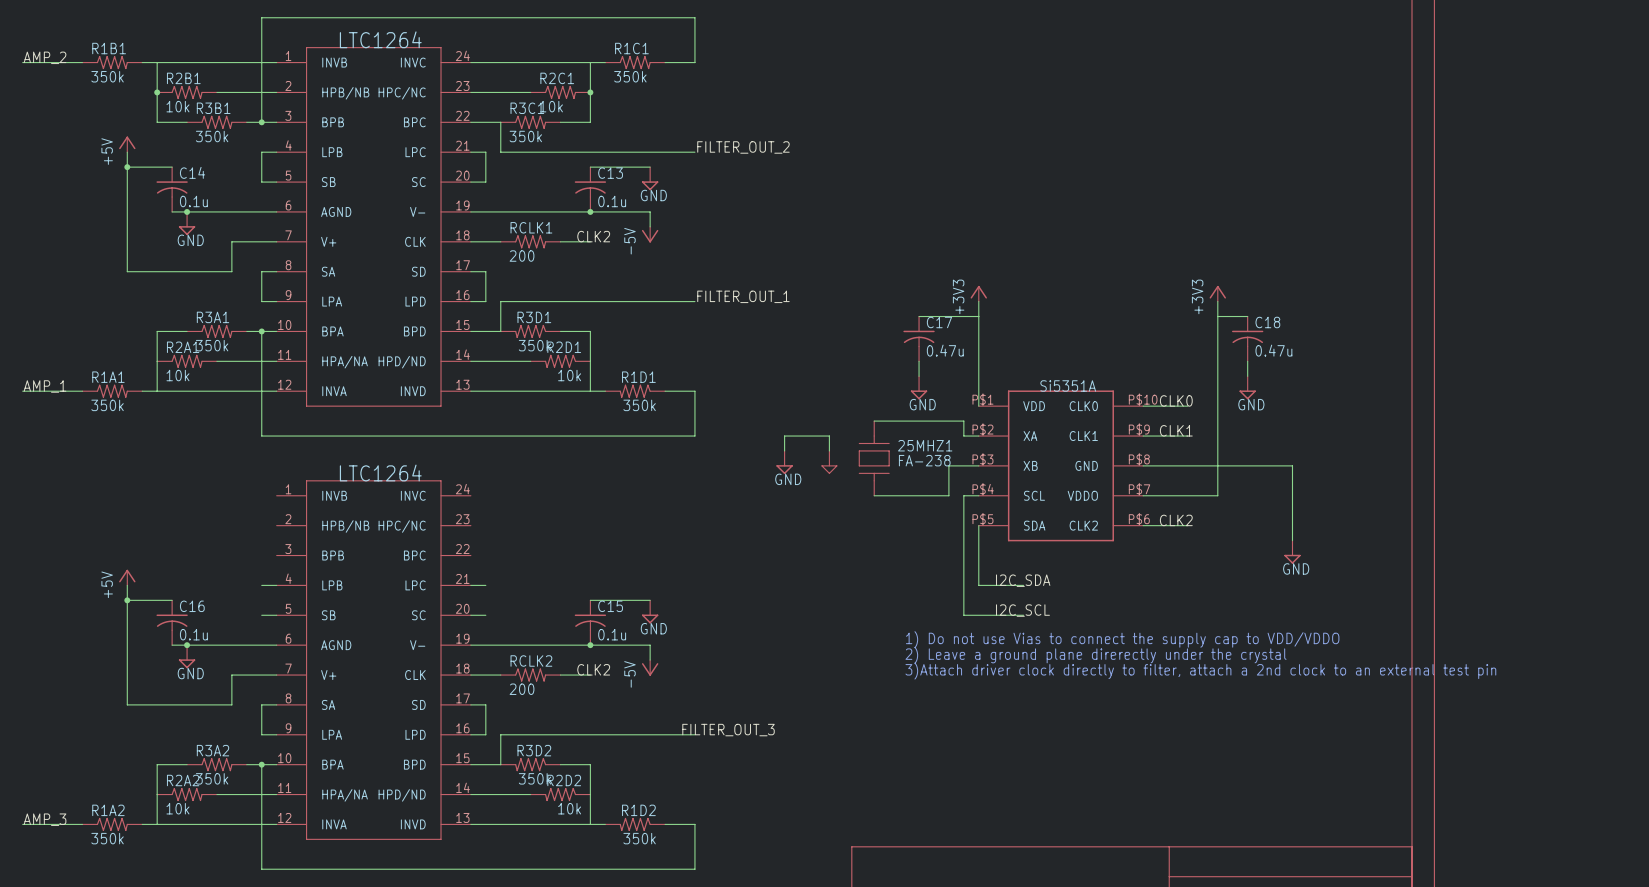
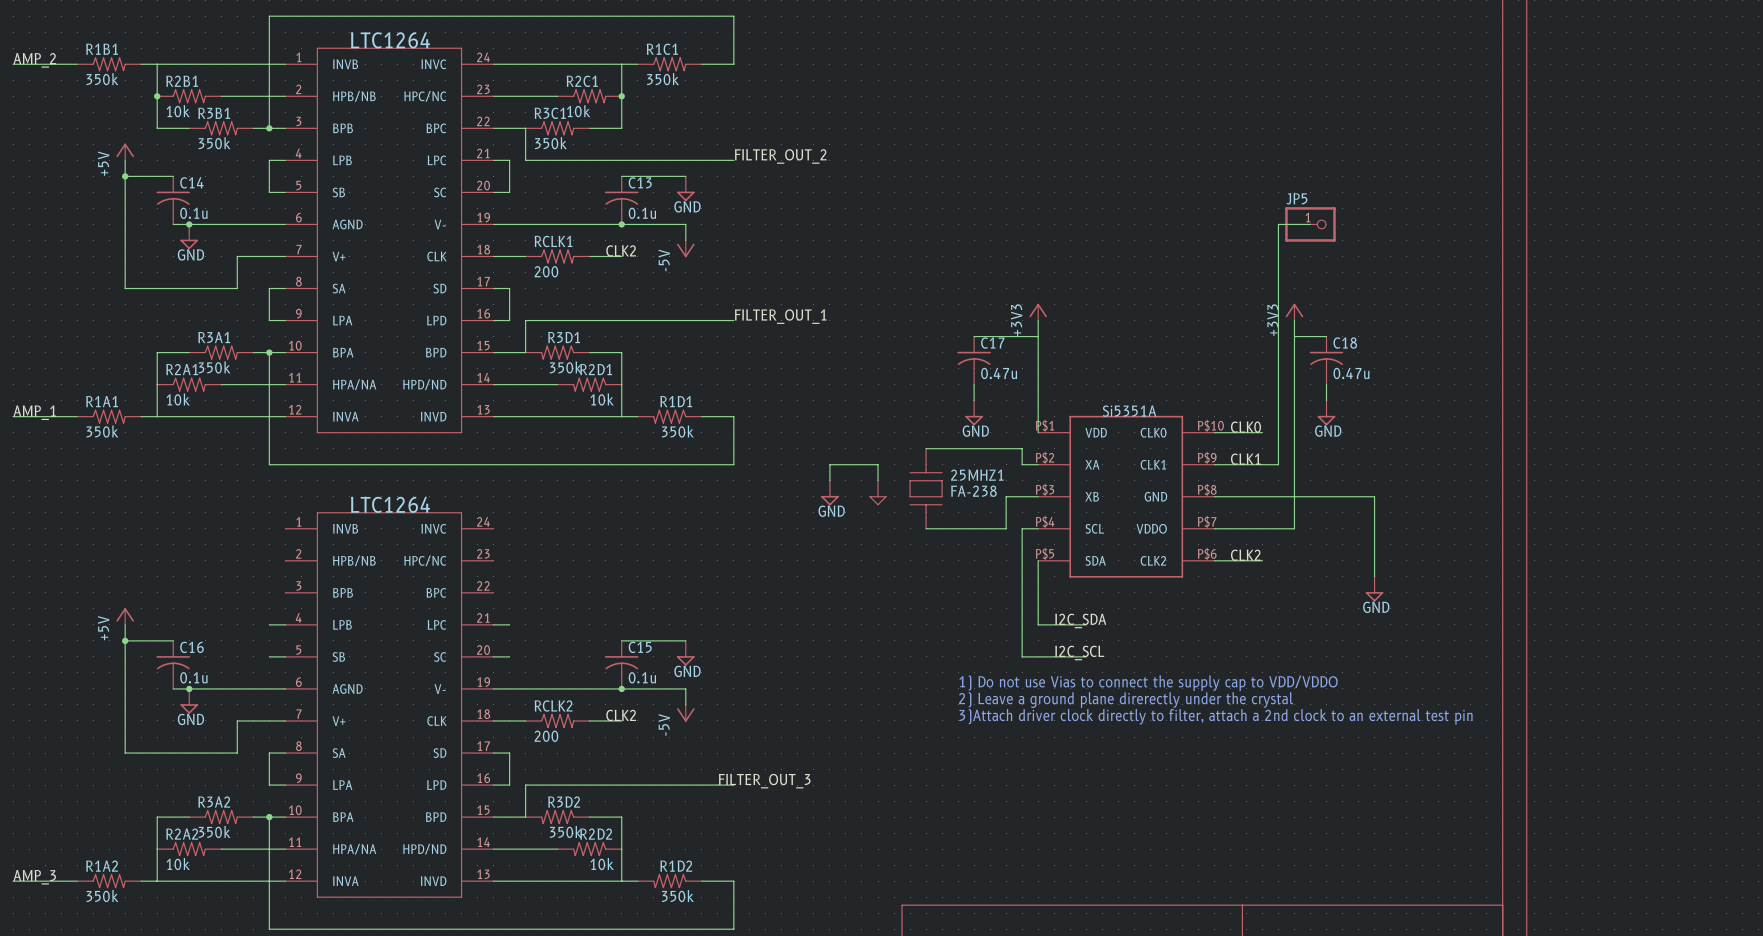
wire: none -> (1310, 224) (1278, 224) (1278, 464) (1262, 464)
JP5: none -> (1310, 224)

